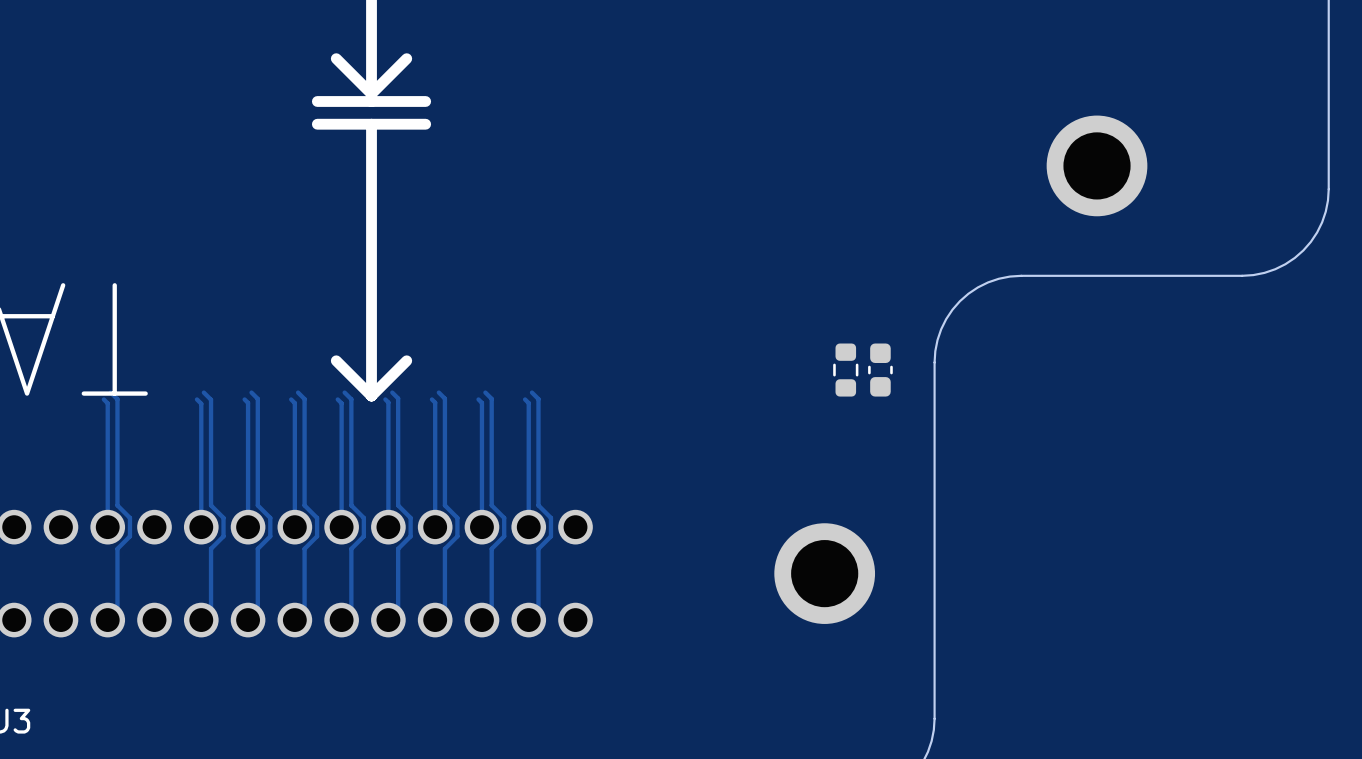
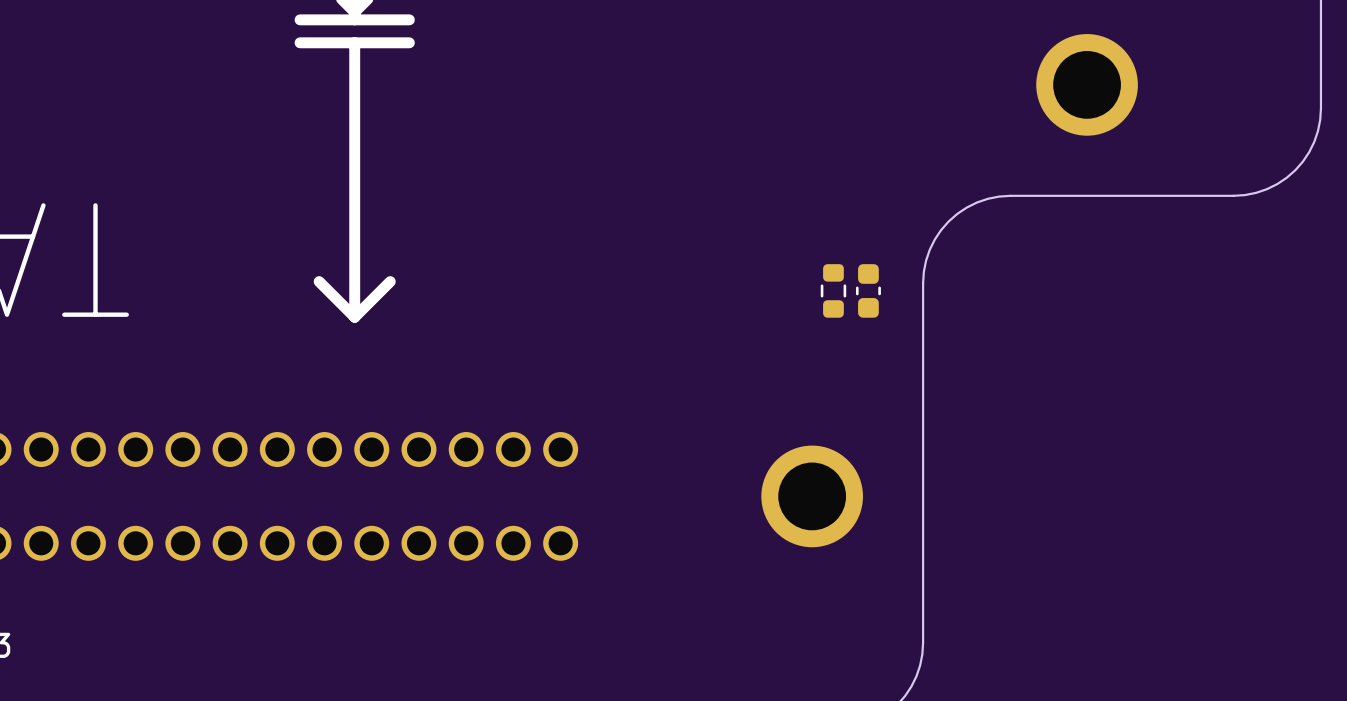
track: (110, 392) (117, 399) (117, 505) (129, 517) (129, 536) (117, 548) (117, 610) (107, 620) -> none
track: (203, 392) (211, 399) (211, 505) (223, 517) (223, 536) (211, 548) (211, 610) (201, 620) -> none
track: (251, 392) (257, 398) (257, 505) (270, 517) (270, 536) (257, 548) (257, 610) (248, 620) -> none
track: (298, 392) (304, 399) (304, 505) (317, 517) (317, 536) (304, 548) (304, 610) (294, 620) -> none
track: (344, 392) (351, 399) (351, 505) (363, 517) (363, 536) (351, 548) (351, 610) (341, 620) -> none
track: (392, 392) (398, 398) (398, 505) (410, 517) (410, 536) (398, 548) (398, 610) (388, 620) -> none
track: (438, 392) (444, 398) (444, 505) (457, 517) (457, 536) (444, 548) (444, 610) (435, 620) -> none
track: (485, 392) (491, 398) (491, 505) (504, 517) (504, 536) (491, 548) (491, 610) (481, 620) -> none
track: (531, 392) (538, 399) (538, 505) (550, 517) (550, 536) (538, 548) (538, 610) (528, 620) -> none
track: (103, 399) (107, 403) (107, 527) -> none
track: (196, 399) (201, 403) (201, 527) -> none
track: (244, 399) (248, 402) (248, 527) -> none
track: (291, 399) (294, 403) (294, 527) -> none
track: (337, 399) (341, 403) (341, 527) -> none
track: (385, 399) (388, 402) (388, 527) -> none
track: (431, 399) (435, 402) (435, 527) -> none
track: (478, 399) (481, 402) (481, 527) -> none
track: (525, 399) (528, 403) (528, 527) -> none

